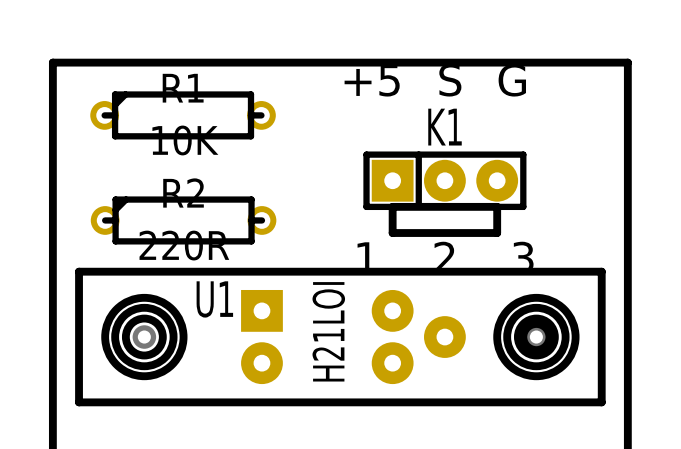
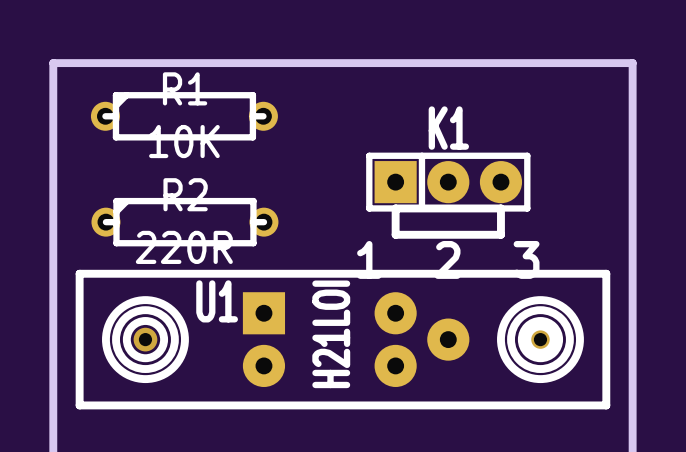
K1 text: +5 (372, 80) -> none
K1 text: S (450, 80) -> none
K1 text: G (512, 80) -> none

